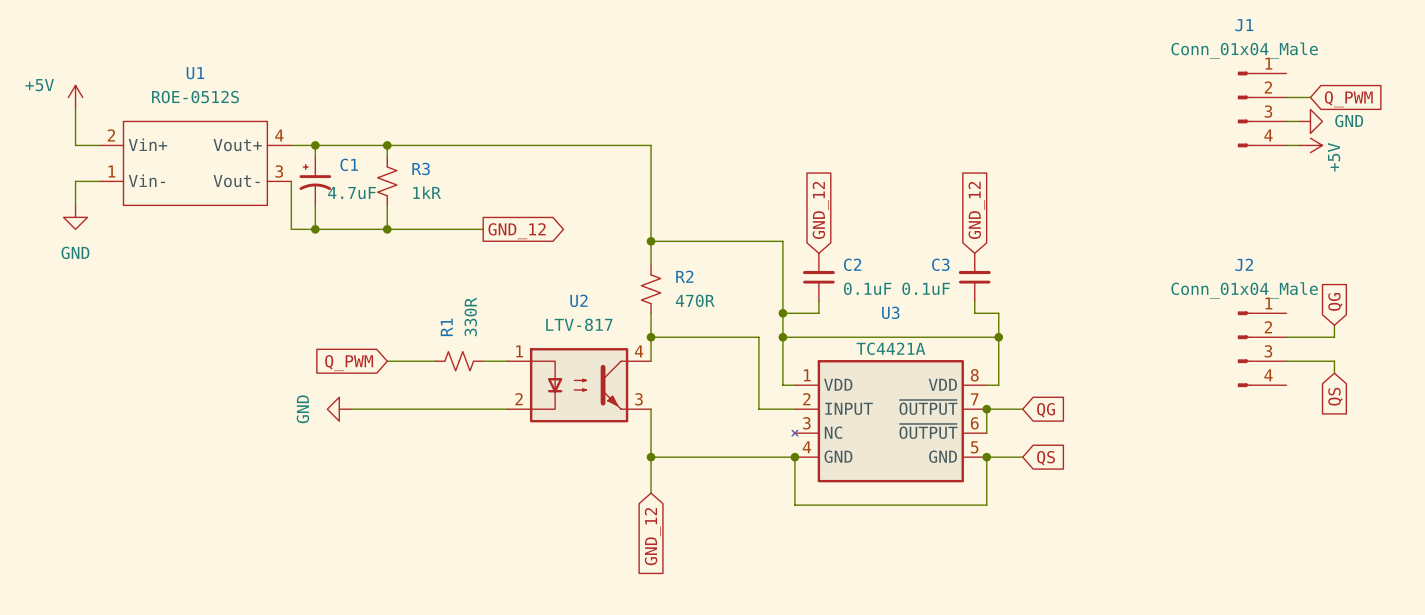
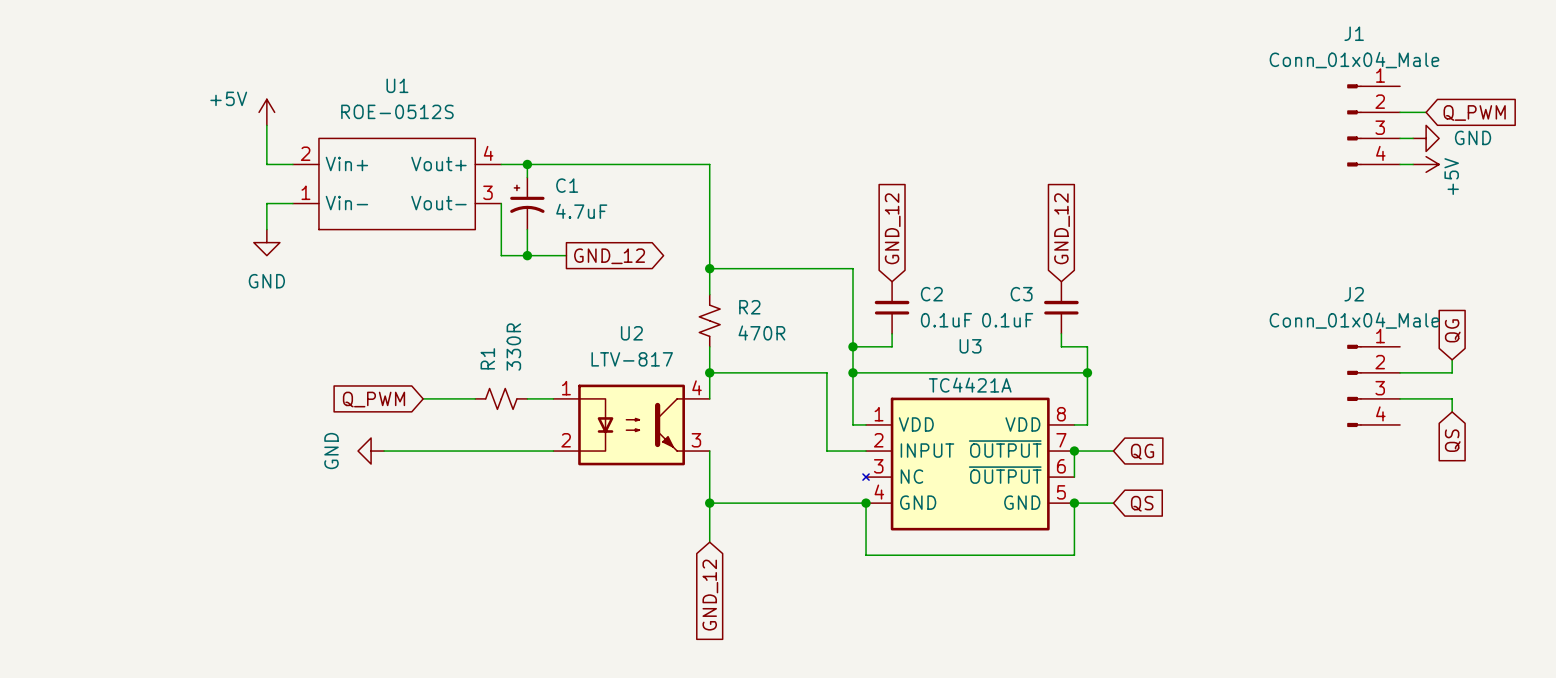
power symbol position: +5V (75, 97) -> +5V (266, 112)
wire: (75, 109) (75, 145) (99, 145) -> (266, 125) (266, 164) (292, 164)
wire: (291, 145) (459, 145) -> none
wire: (315, 145) (315, 157) -> (527, 164) (527, 177)
junction: (315, 145) -> none
wire: (387, 145) (387, 157) -> none
junction: (387, 145) -> none
junction: none -> (527, 164)
U1 position: (195, 163) -> (397, 184)
wire: (99, 181) (75, 181) (75, 205) -> (292, 203) (266, 203) (266, 229)
wire: (291, 181) (291, 229) (459, 229) -> (501, 203) (501, 255)
C1 position: (315, 181) -> (527, 203)
R3: 1kR (387, 181) -> none
C1 value position: 4.7uF (351, 193) -> 4.7uF (581, 211)
wire: (315, 205) (315, 229) -> none
wire: (387, 205) (387, 229) -> none
wire: none -> (527, 229) (527, 255) (566, 255)
power symbol position: GND (75, 217) -> GND (266, 242)
junction: (315, 229) -> none
junction: (387, 229) -> none
junction: none -> (527, 255)
global label position: GND_12 (517, 231) -> GND_12 (609, 256)

